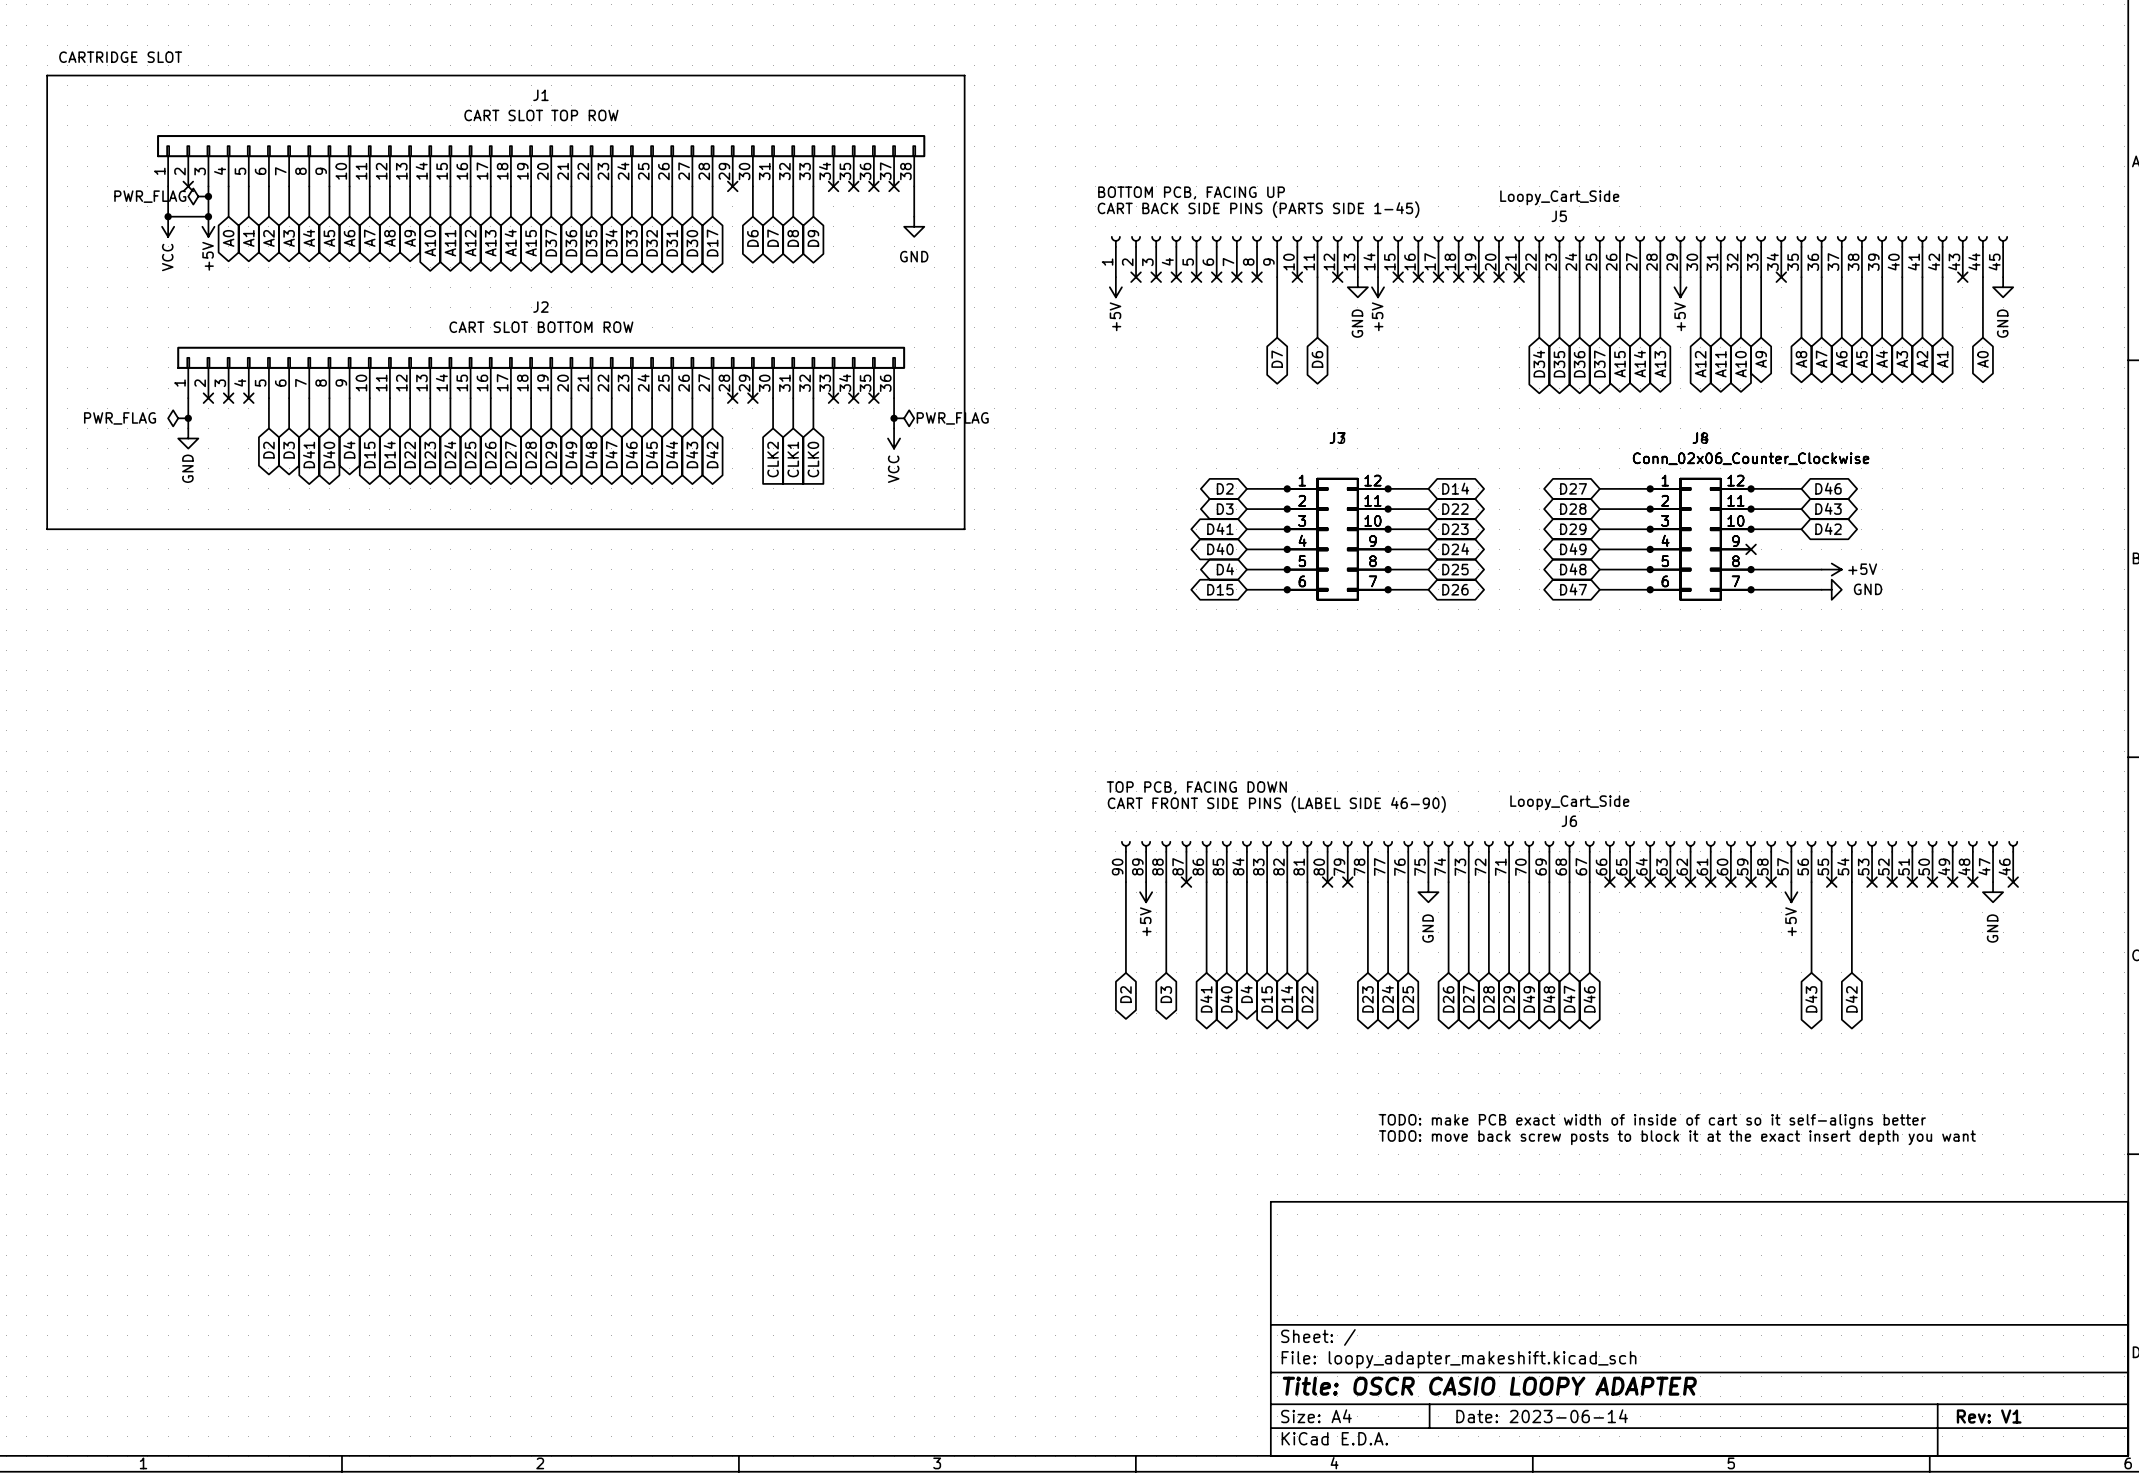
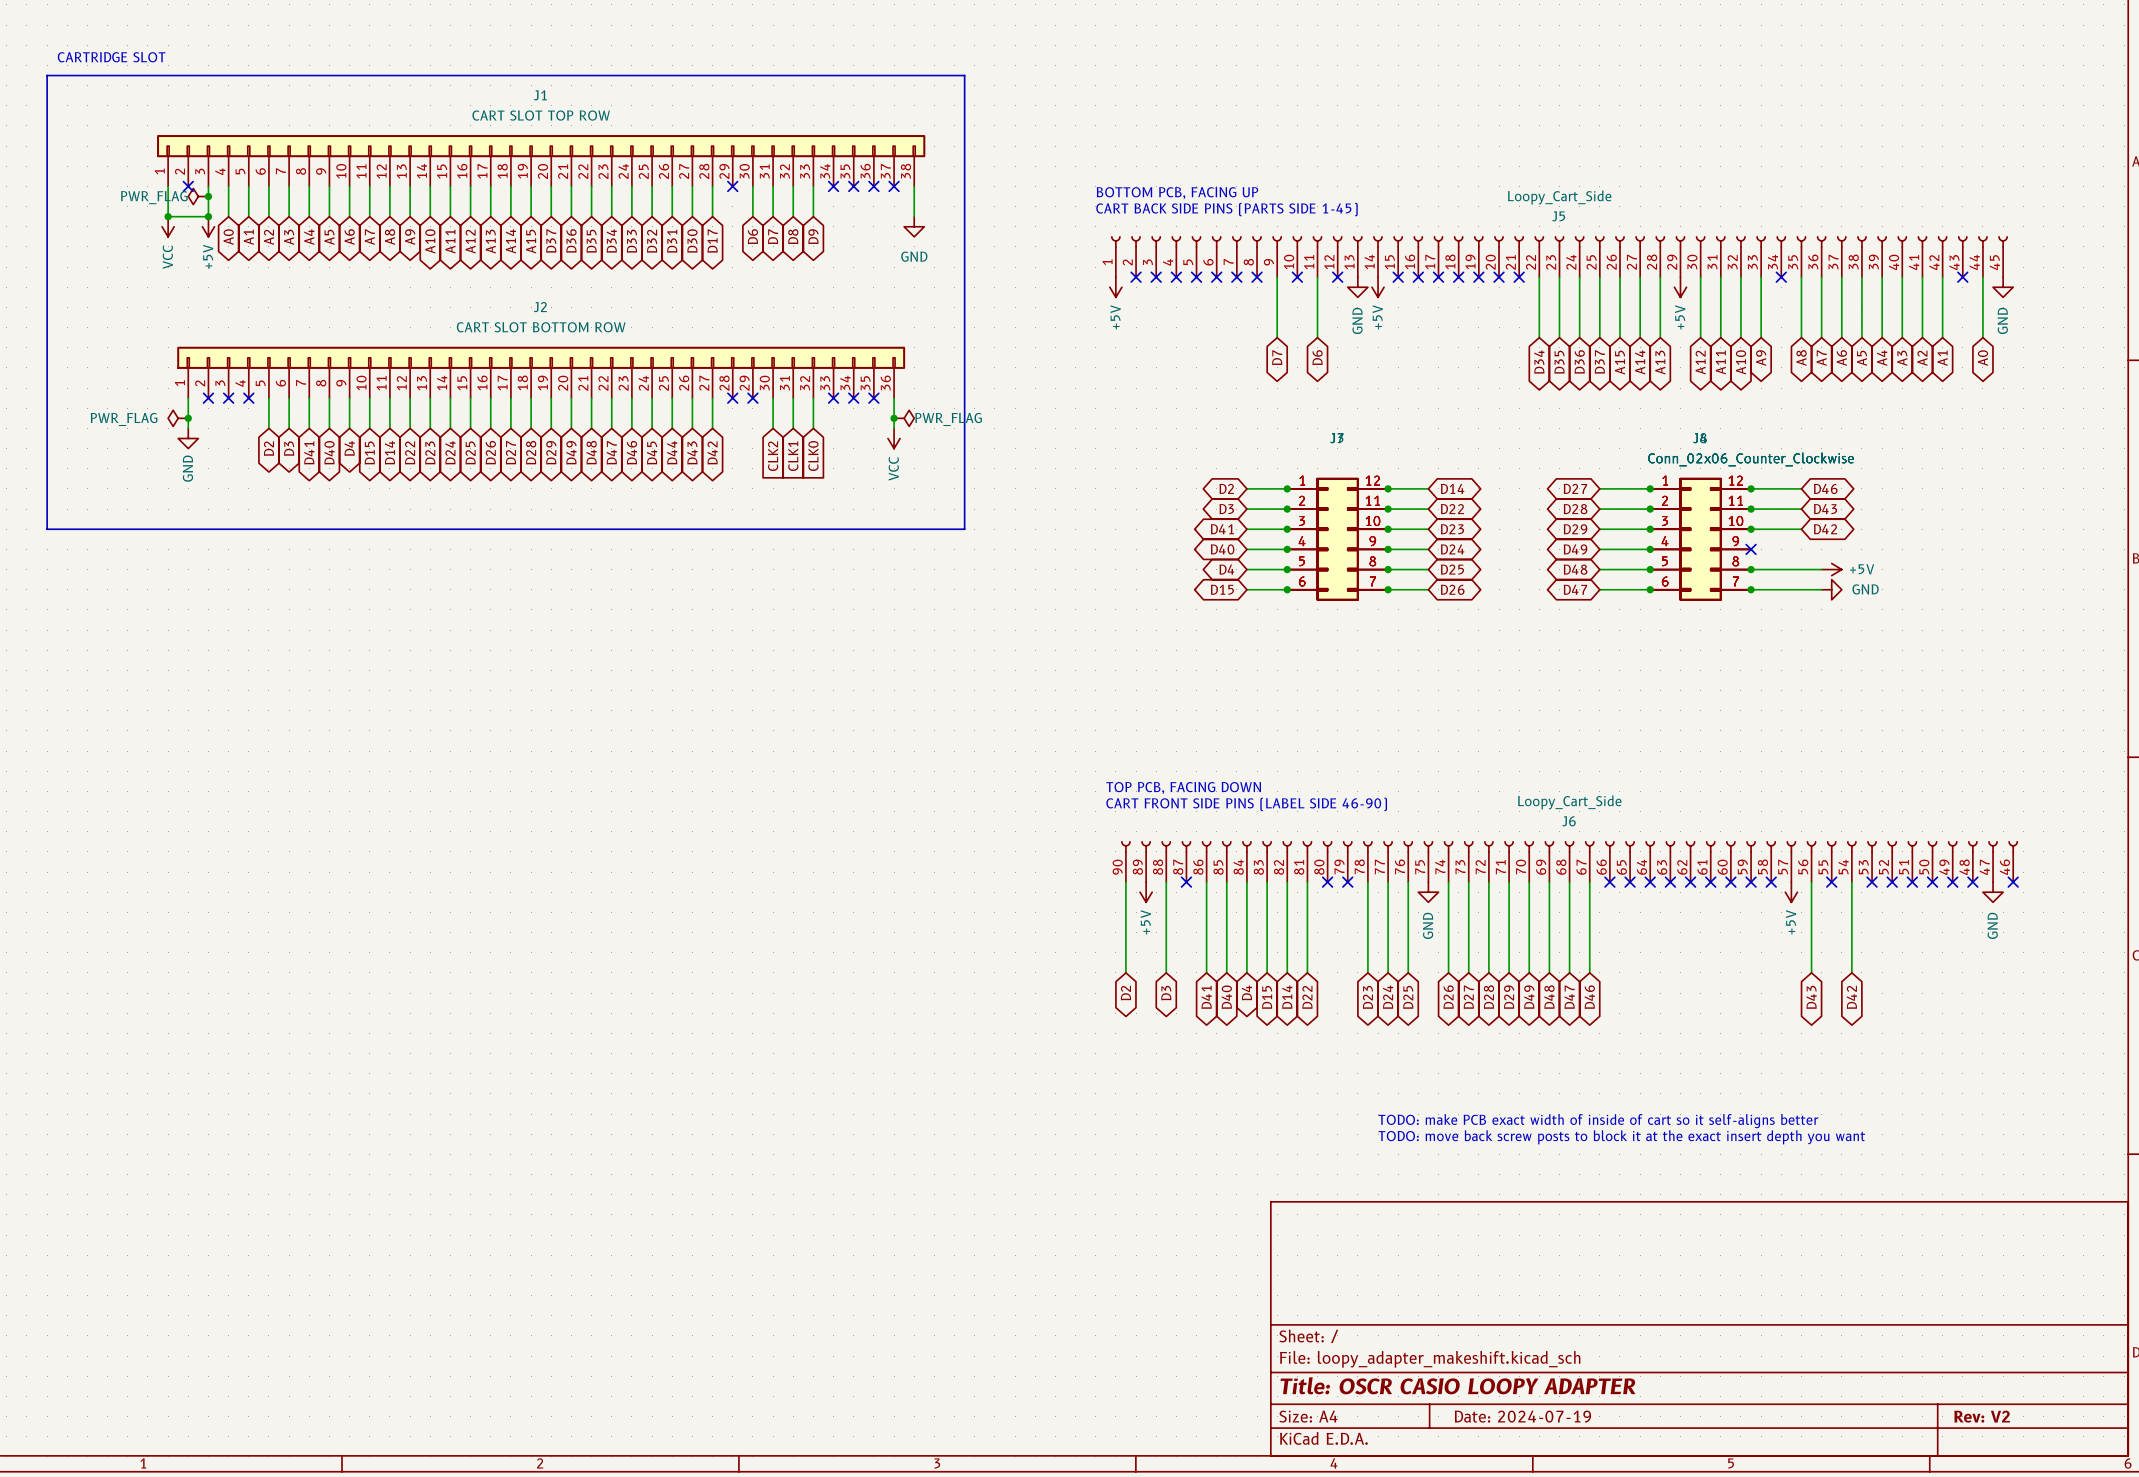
title block: Date: 2023-06-14 (1542, 1416) -> Date: 2024-07-19 (1522, 1416)
title block: Rev: V1 (1989, 1416) -> Rev: V2 (1982, 1416)

